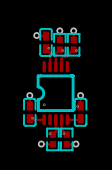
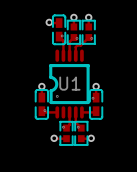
U1 name: none -> U1 (69, 83)

